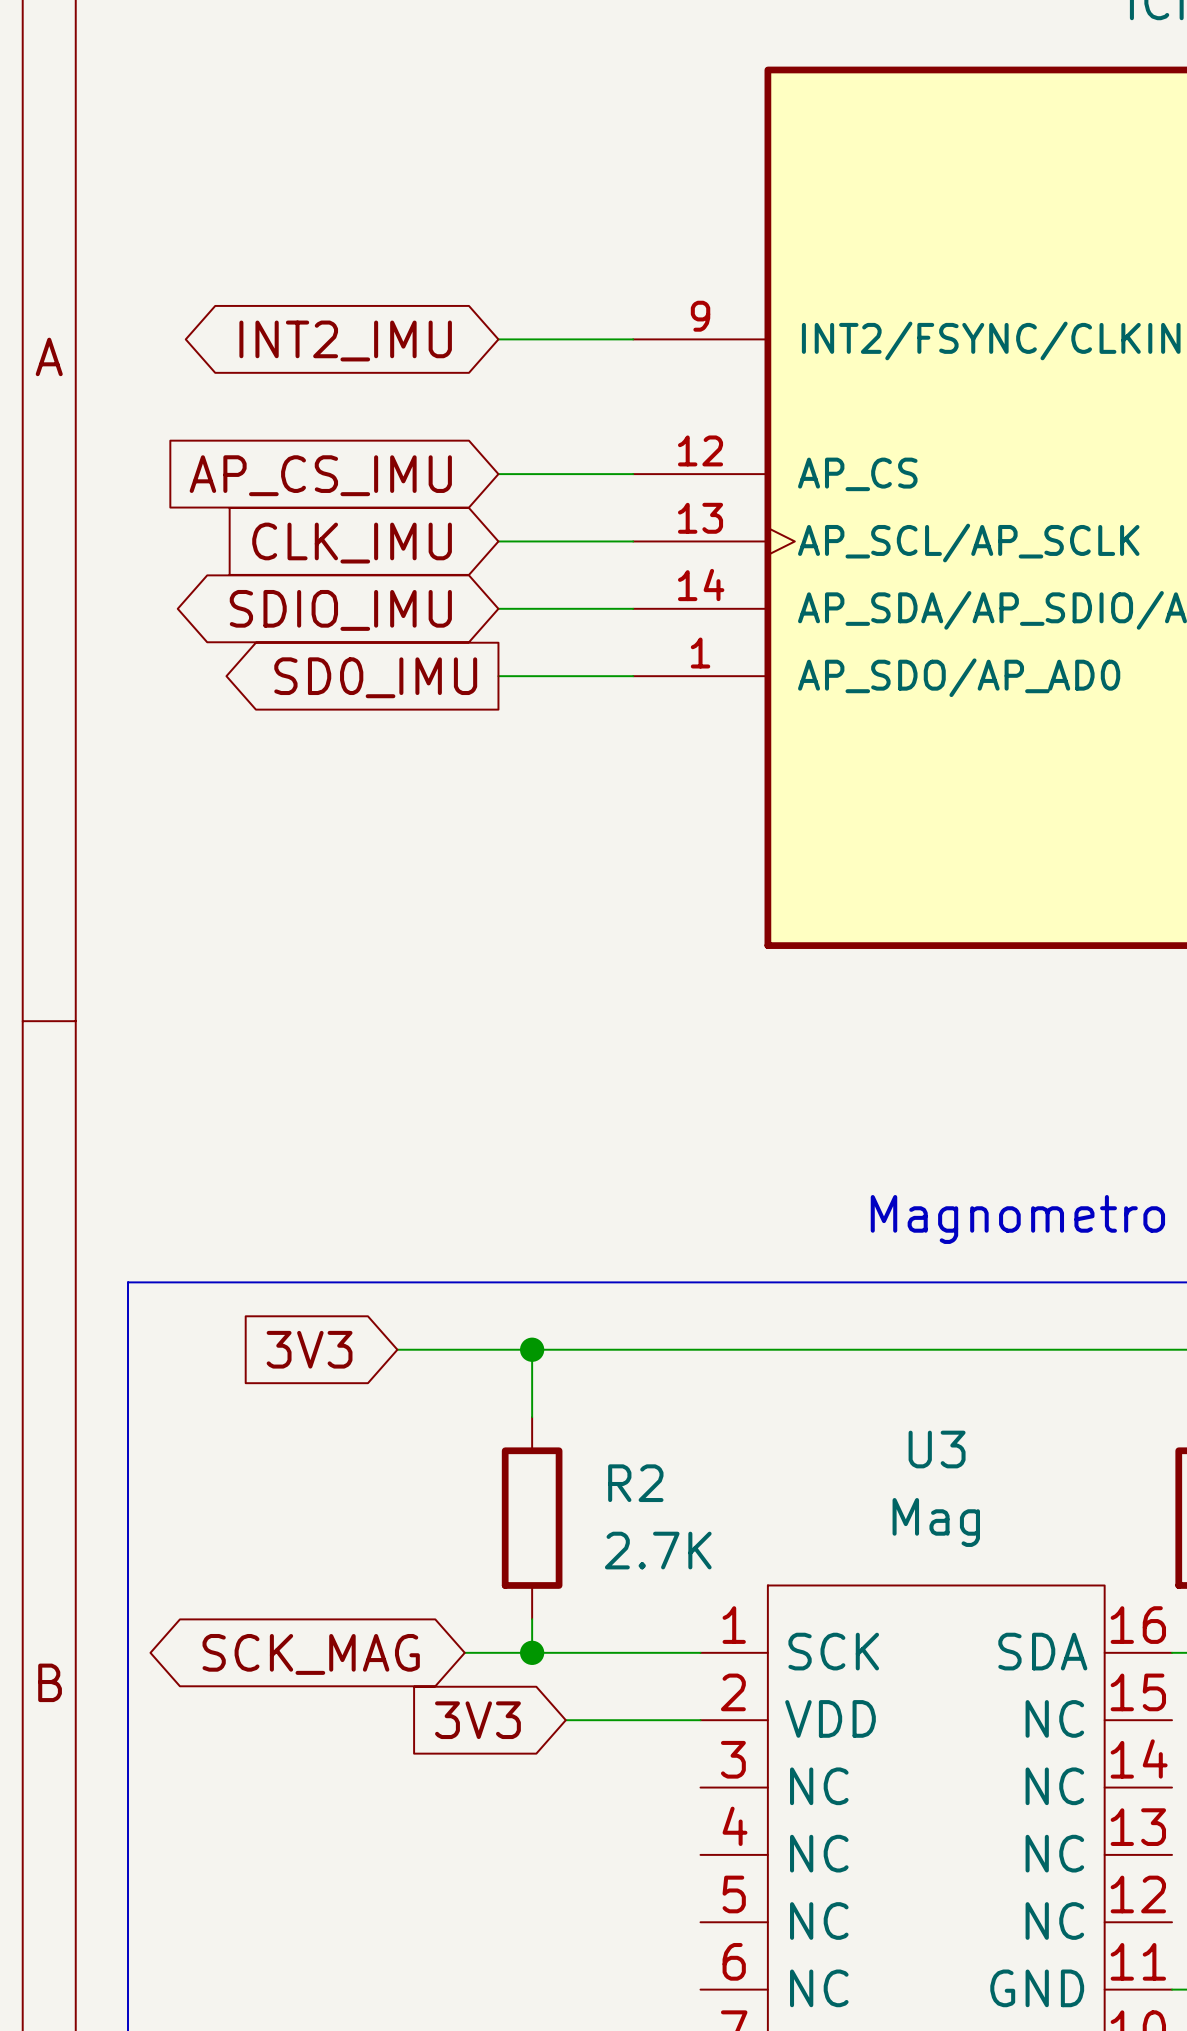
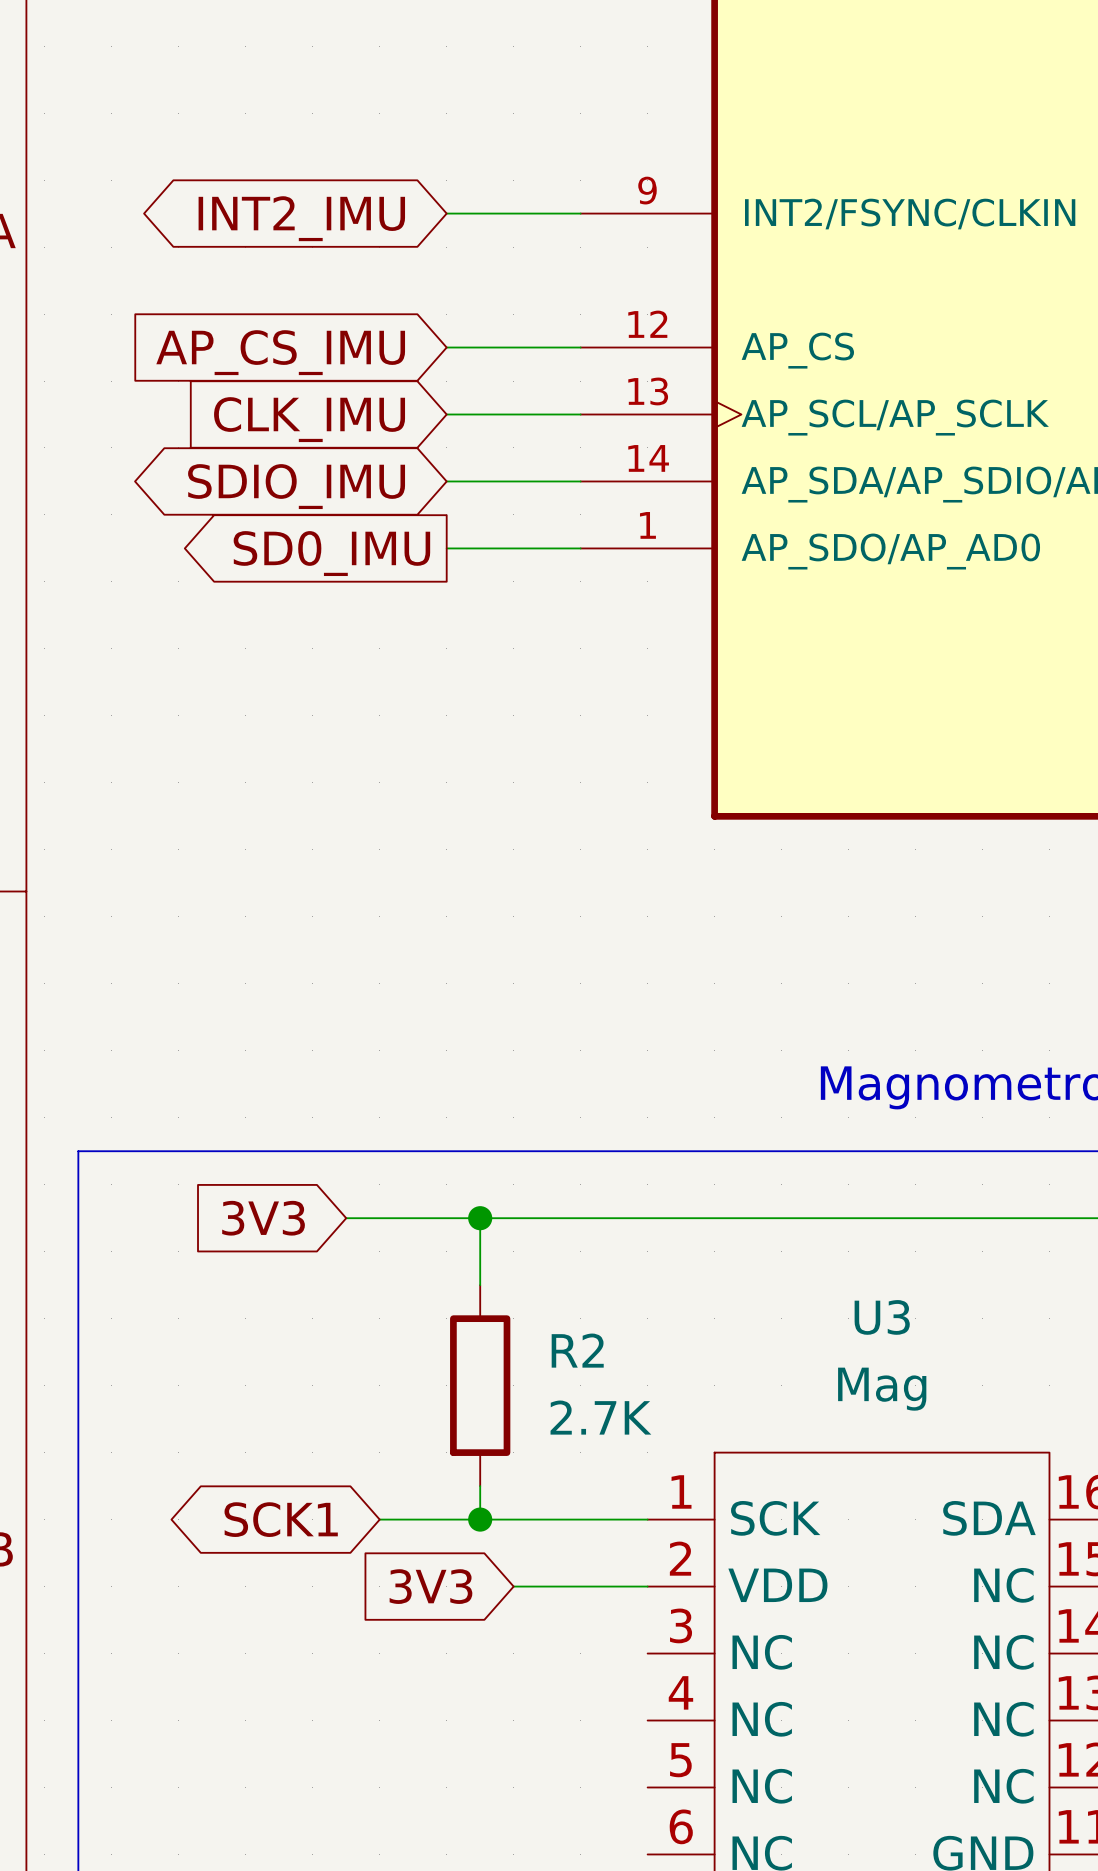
global label: none -> SCK1 (281, 1519)
wire: none -> (379, 1519) (413, 1519)
global label: SCK_MAG (311, 1654) -> none

